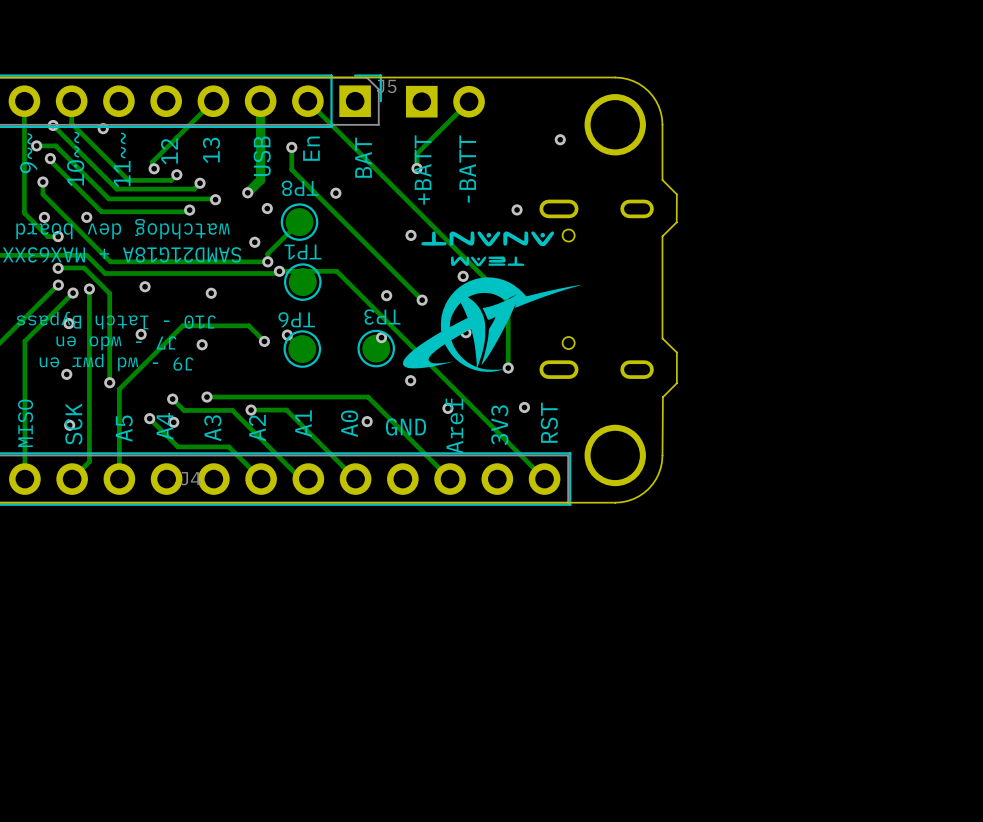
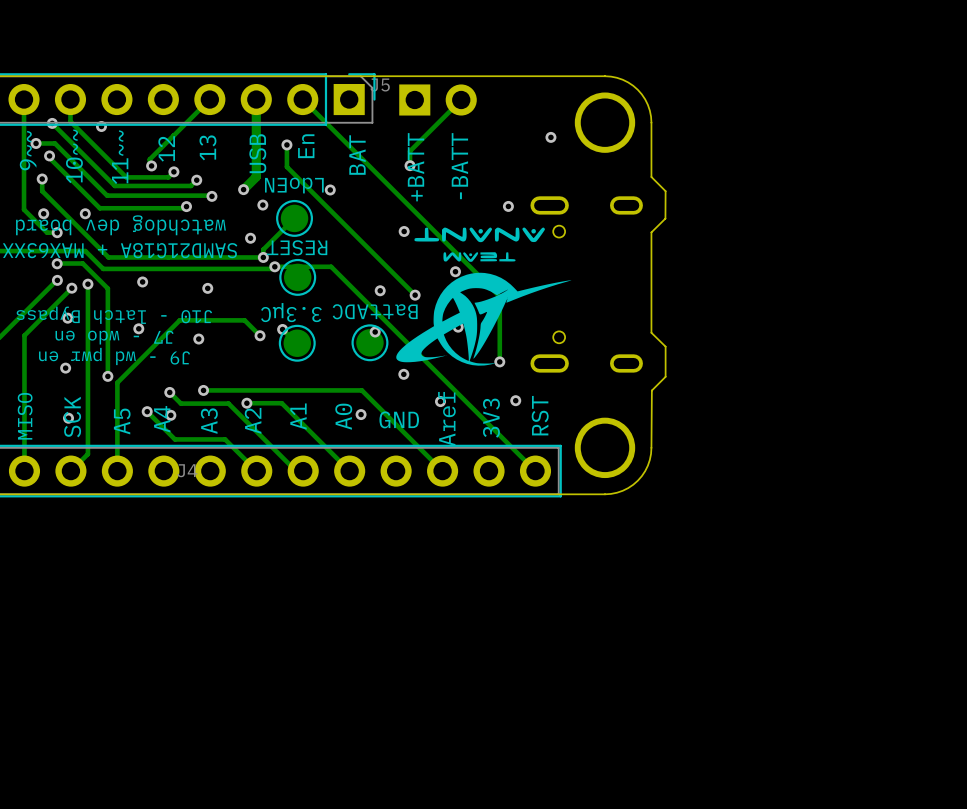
TP8 name: TP8 (300, 188) -> LdoEN (294, 185)
TP1 name: TP1 (303, 252) -> RESET (297, 247)
TP3 name: TP3 (382, 317) -> BattADC (375, 311)
TP6 name: TP6 (296, 319) -> 3.3μC (291, 312)

